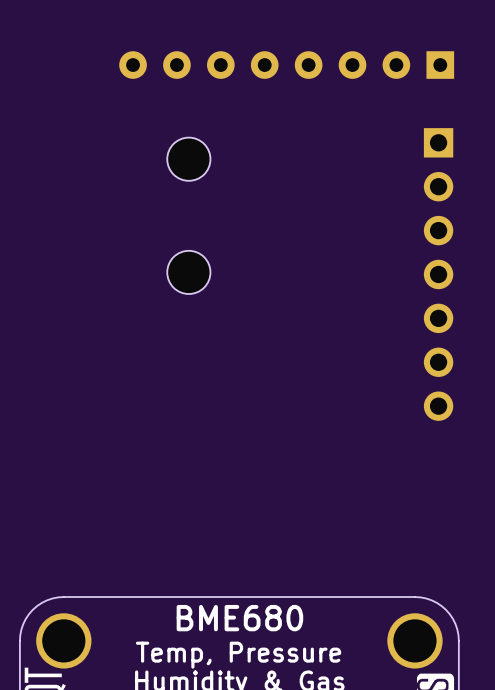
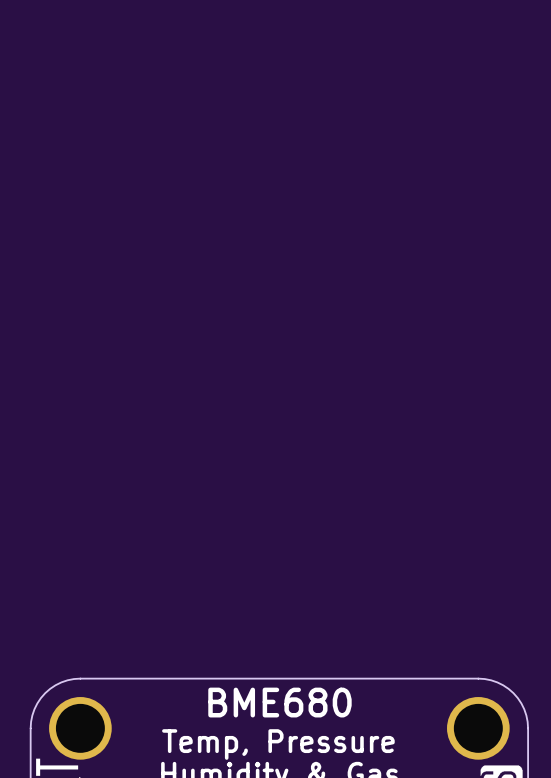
part: (286, 65) -> none
part: (188, 159) -> none
part: (188, 272) -> none
part: (438, 274) -> none

